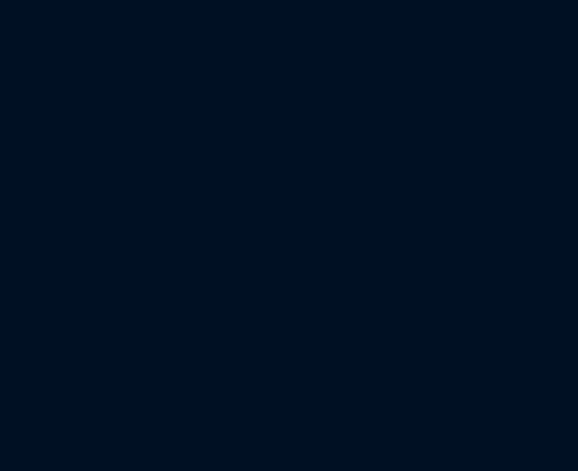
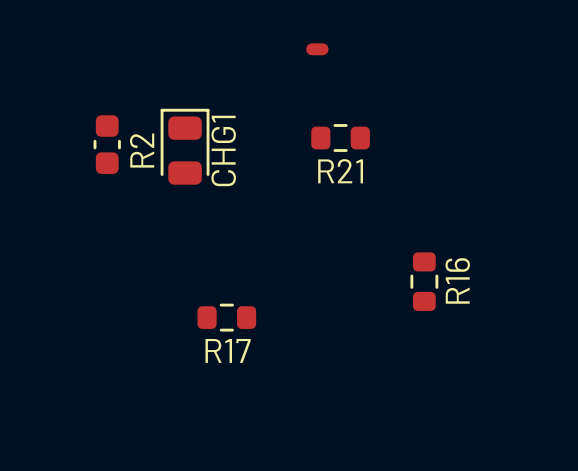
top track: none -> (312, 49) (322, 49)
R21: none -> (340, 138)
R2: none -> (107, 144)
CHG1: none -> (185, 146)
R16: none -> (424, 281)
R17: none -> (226, 317)

